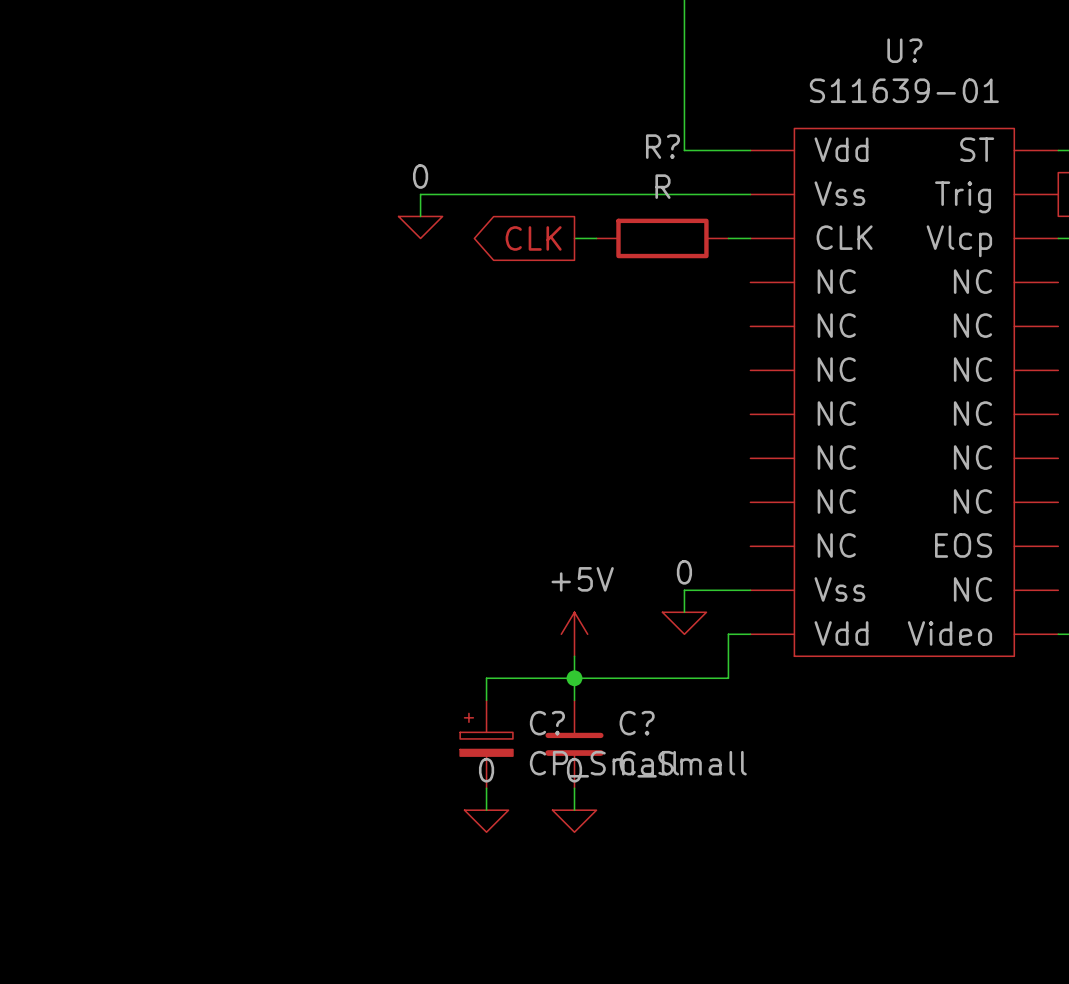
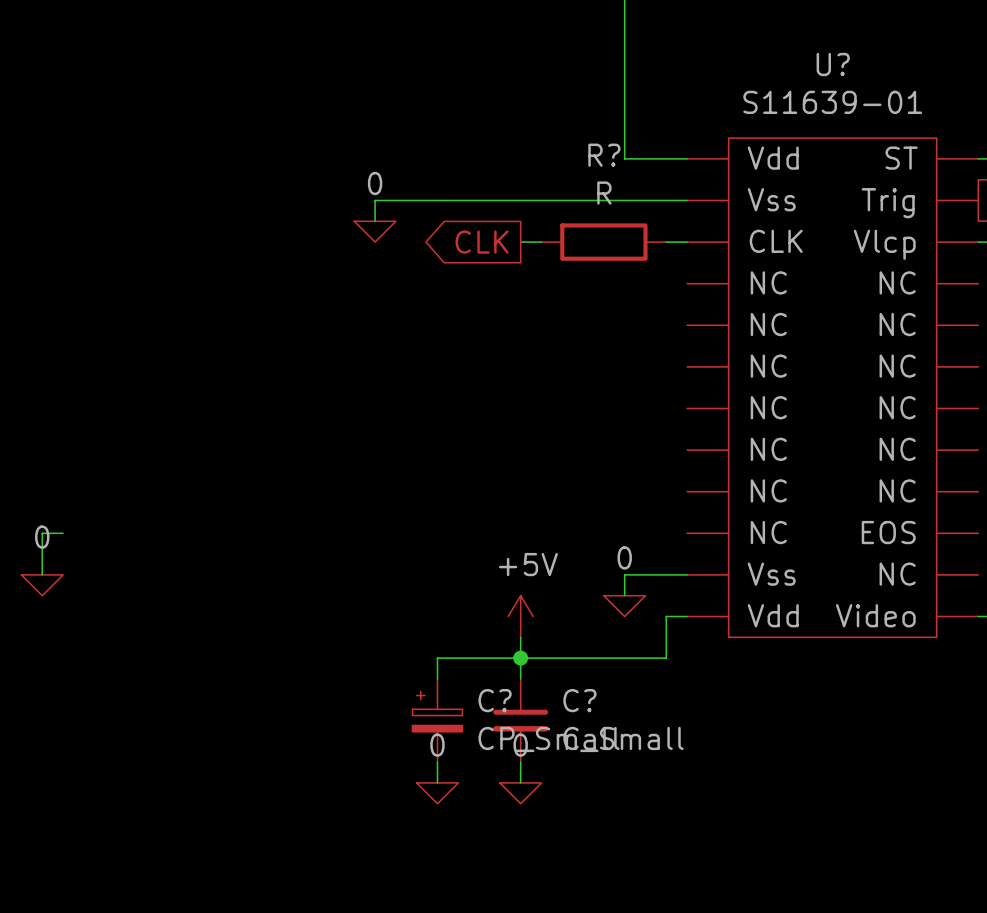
wire: none -> (63, 533) (42, 533) (42, 574)
power symbol: none -> 0 (42, 585)

